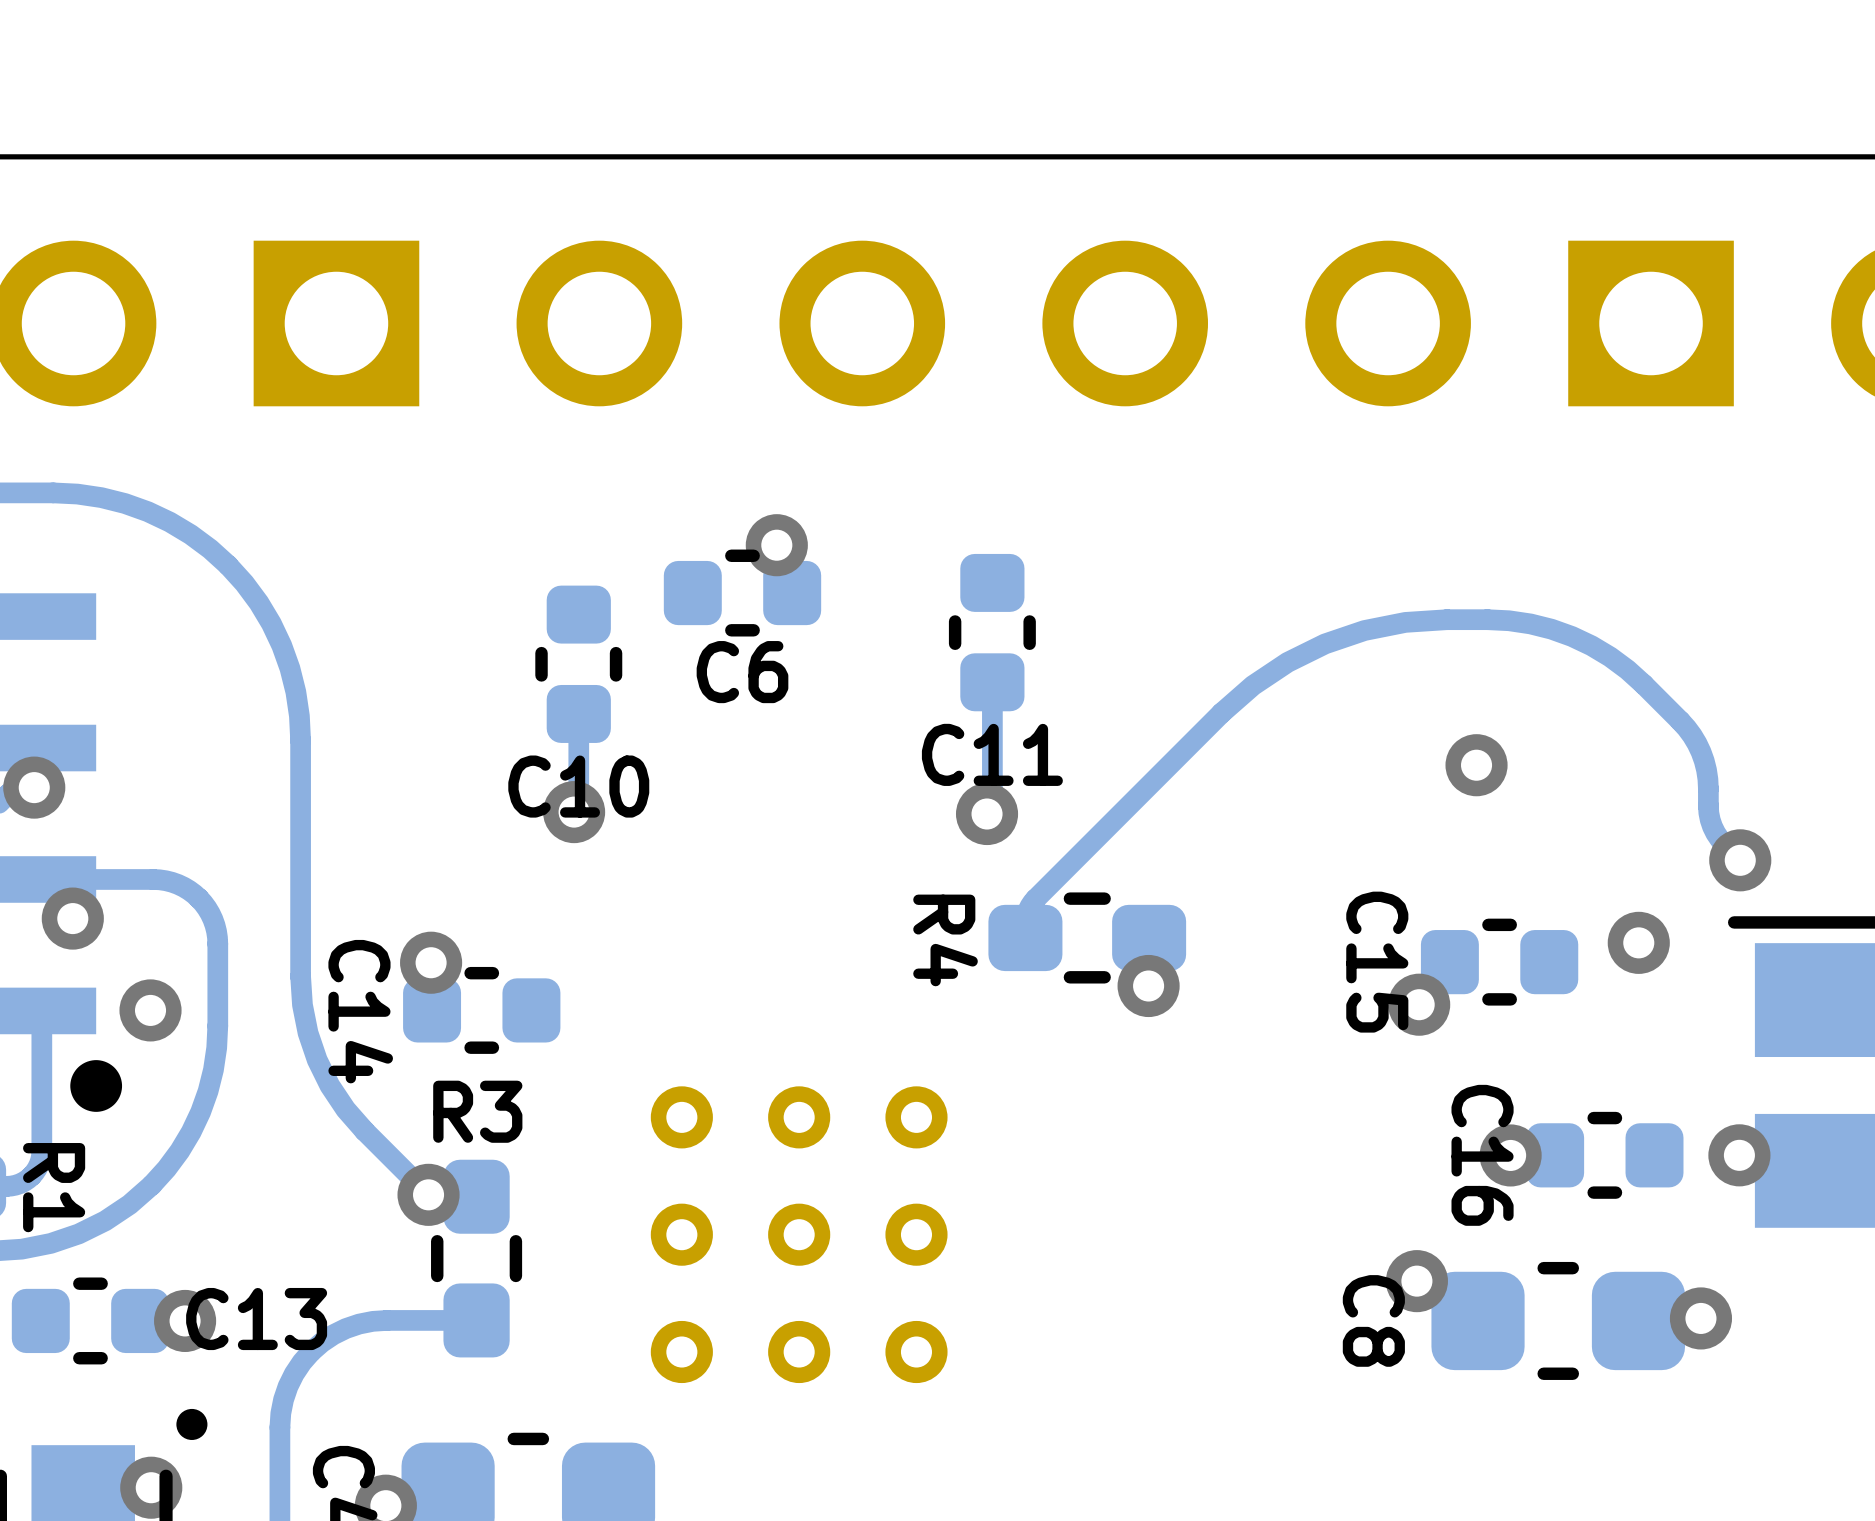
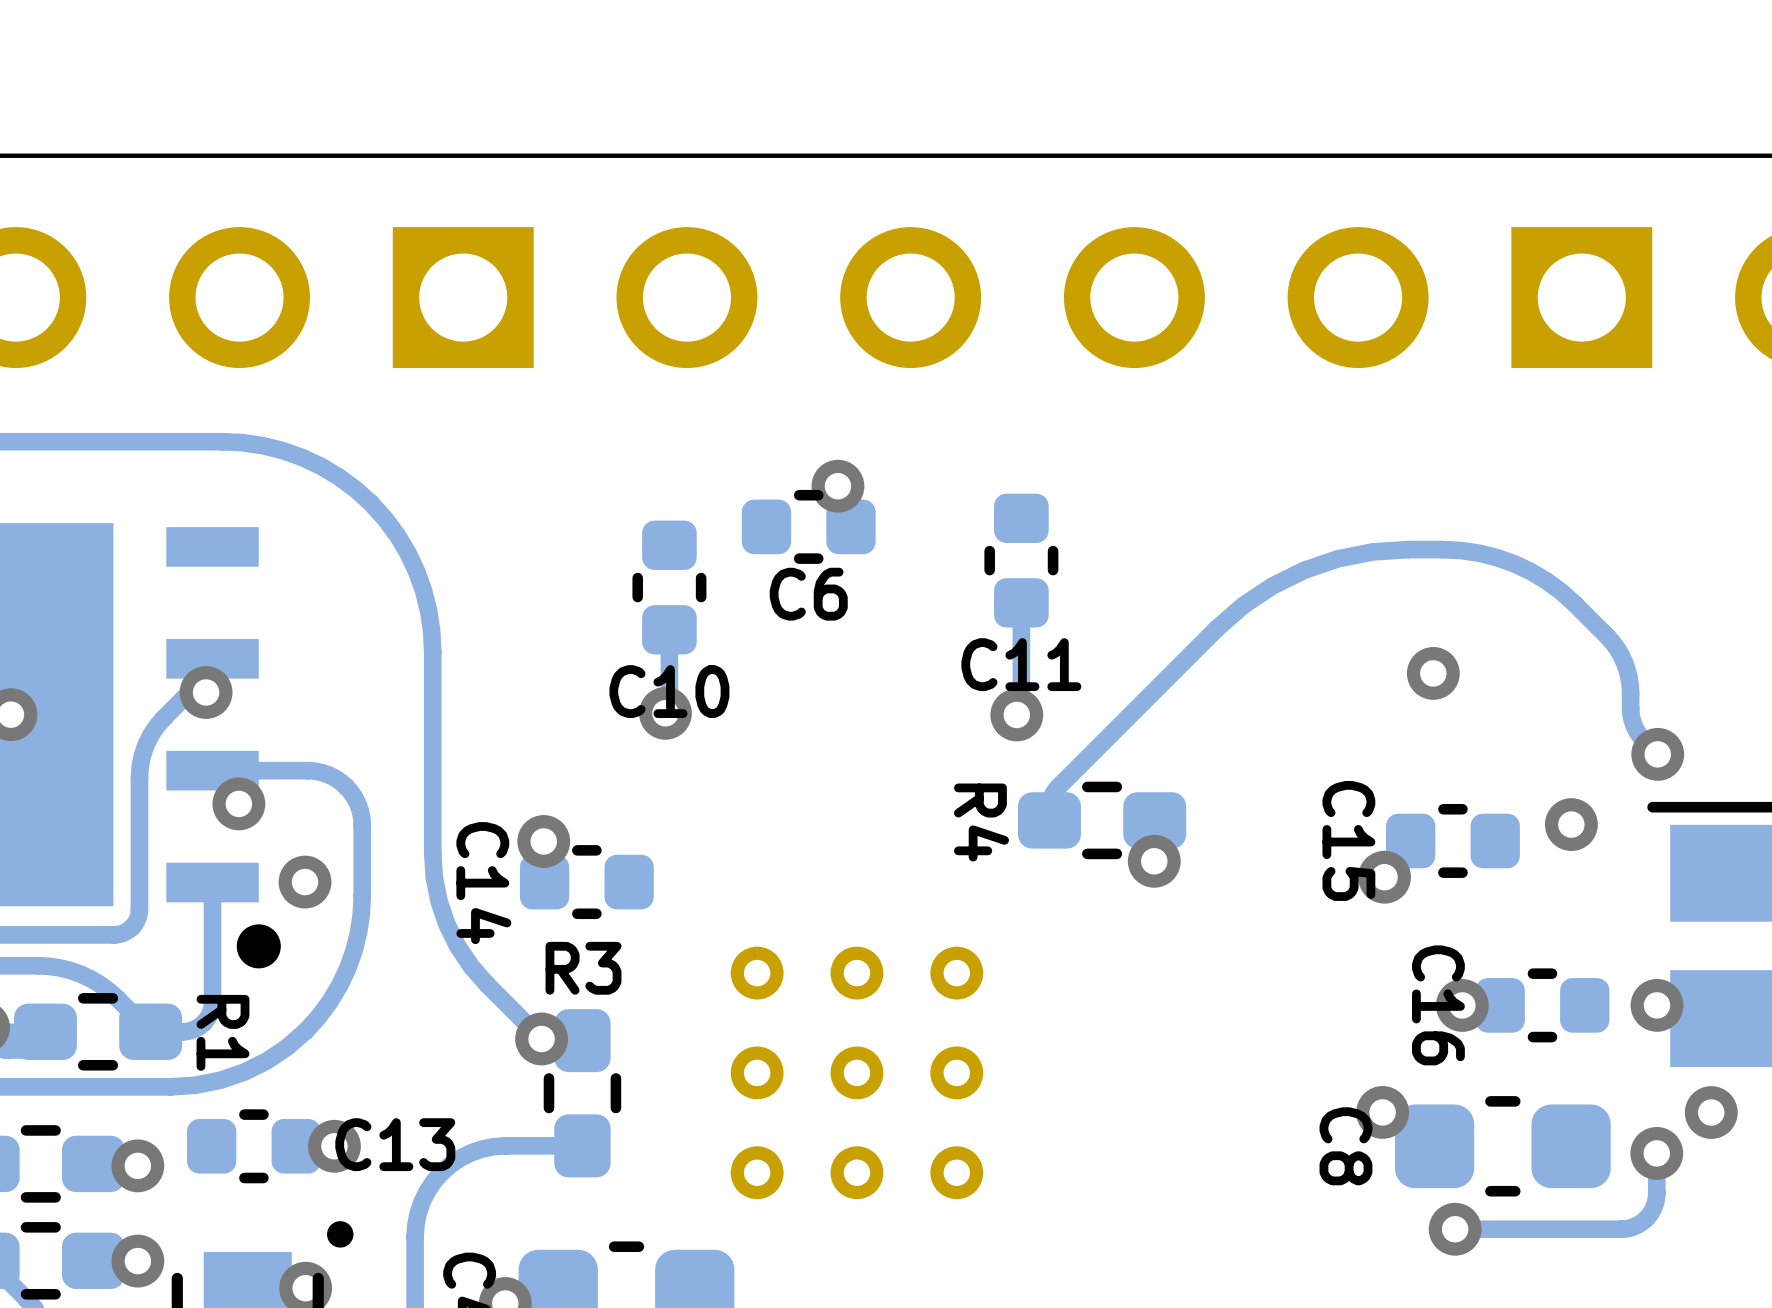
via: none -> (1711, 1112)
via position: (1700, 1318) -> (1656, 1153)
track: none -> (1656, 1153) (1655, 1203) (1648, 1216) (1634, 1226) (1620, 1229) (1455, 1229)
via: none -> (1455, 1229)

